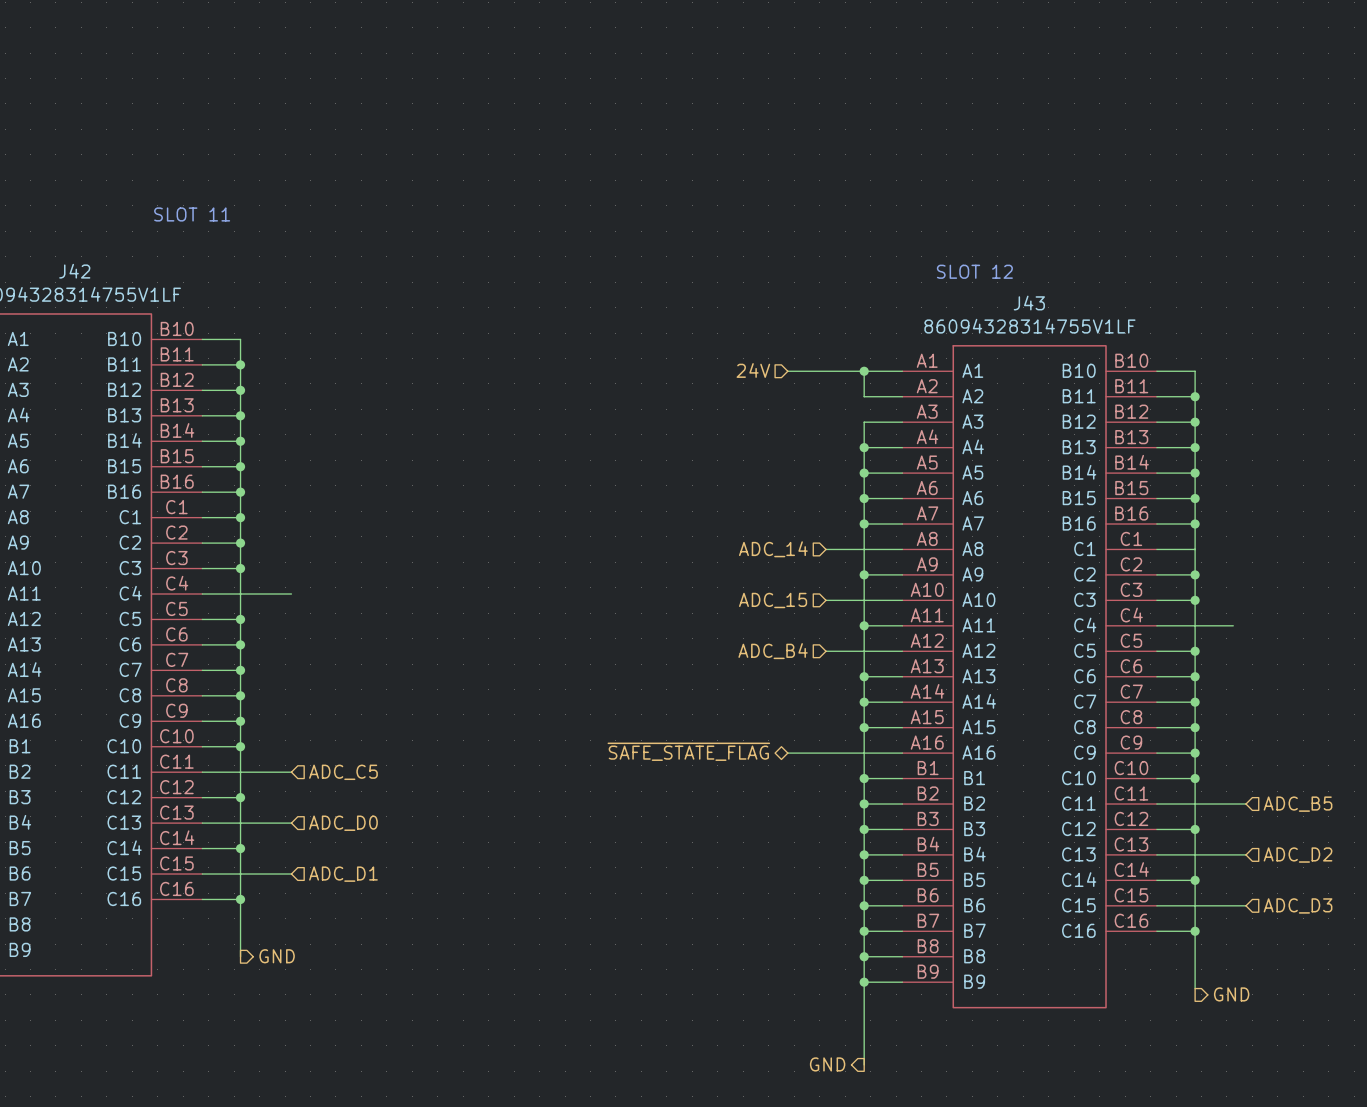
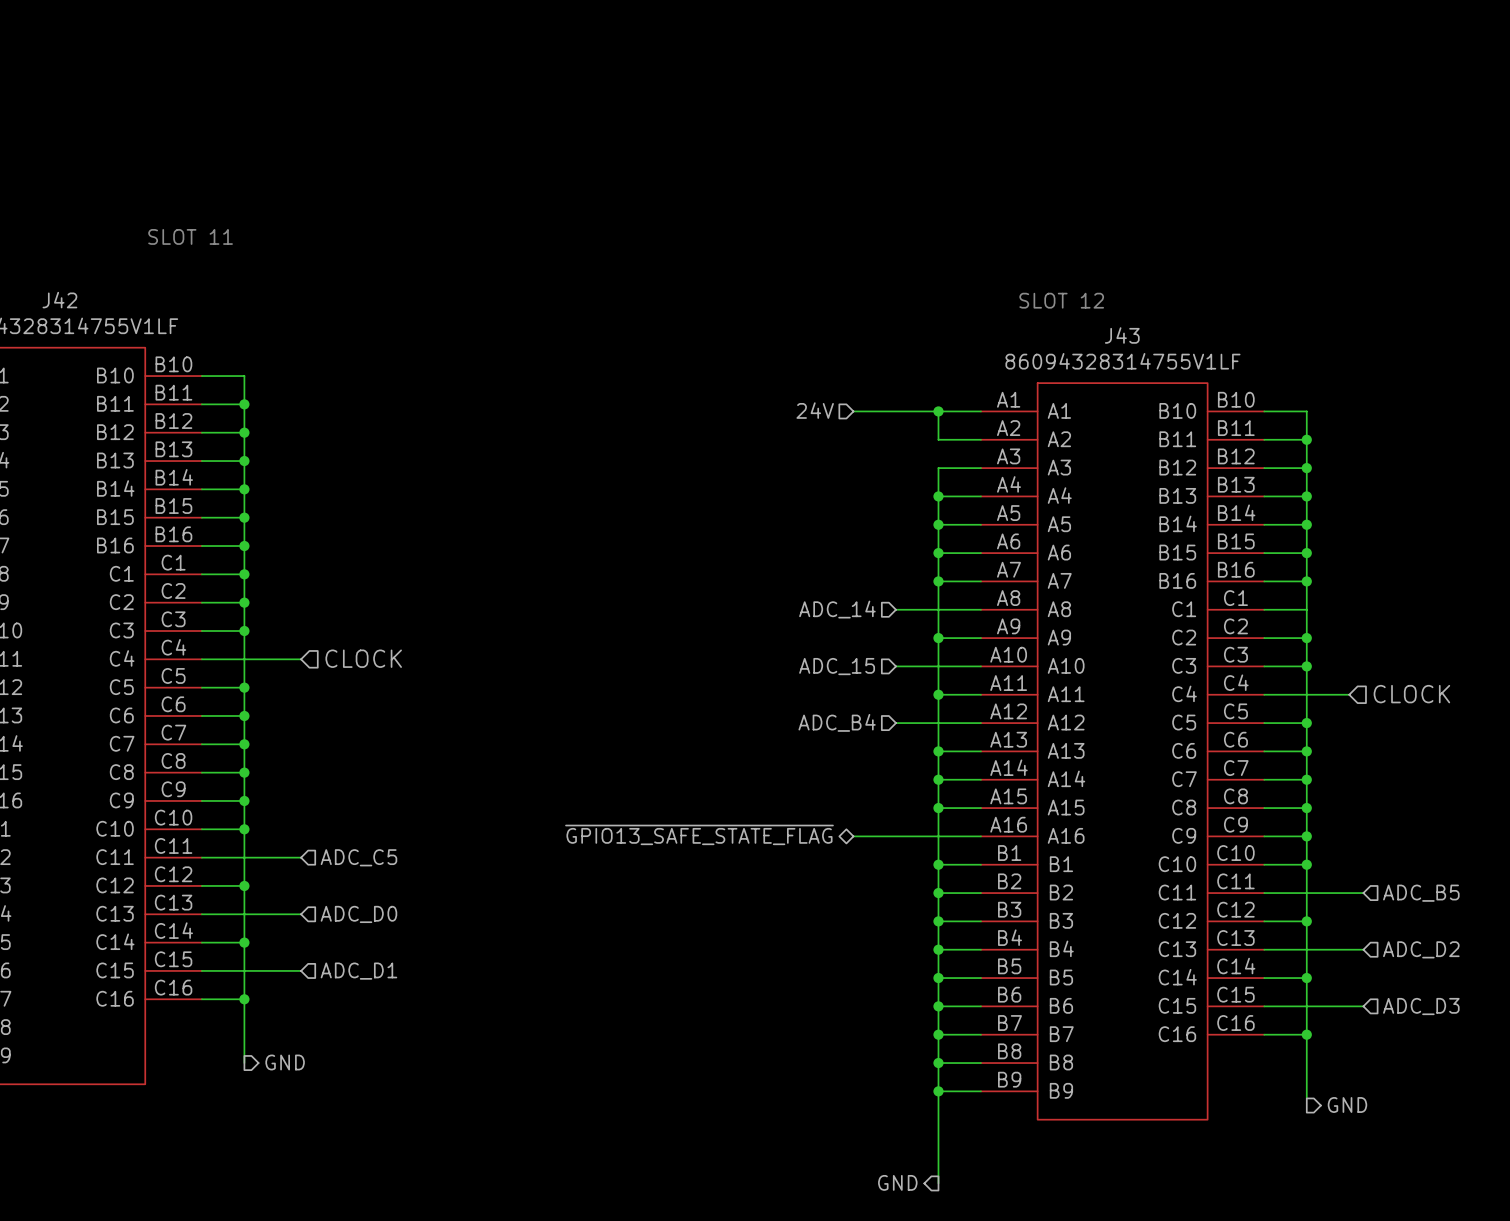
hierarchical label: none -> CLOCK (363, 658)
hierarchical label: none -> CLOCK (1411, 694)
hierarchical label: ~{SAFE_STATE_FLAG} (688, 751) -> ~{GPIO13_SAFE_STATE_FLAG} (699, 834)

